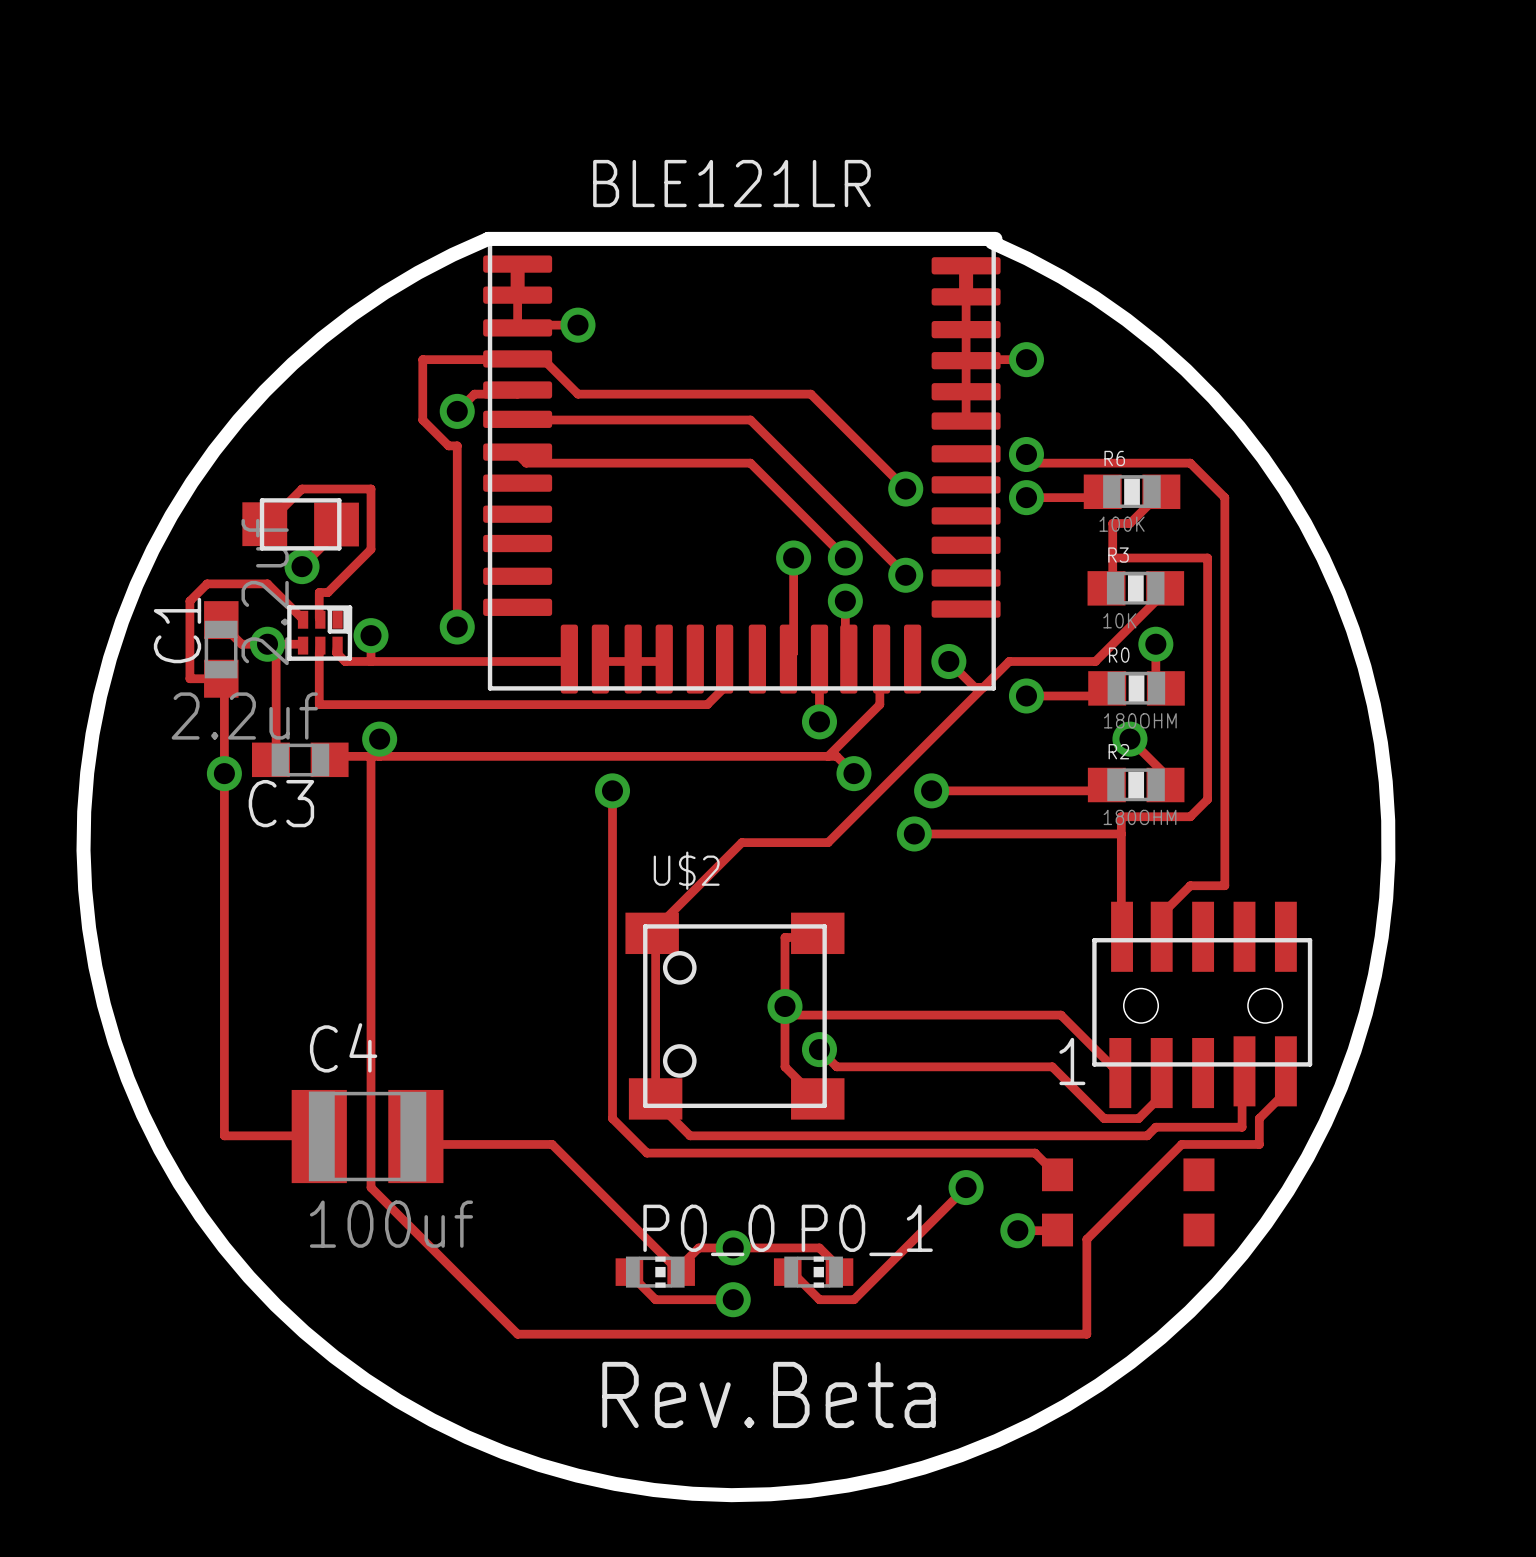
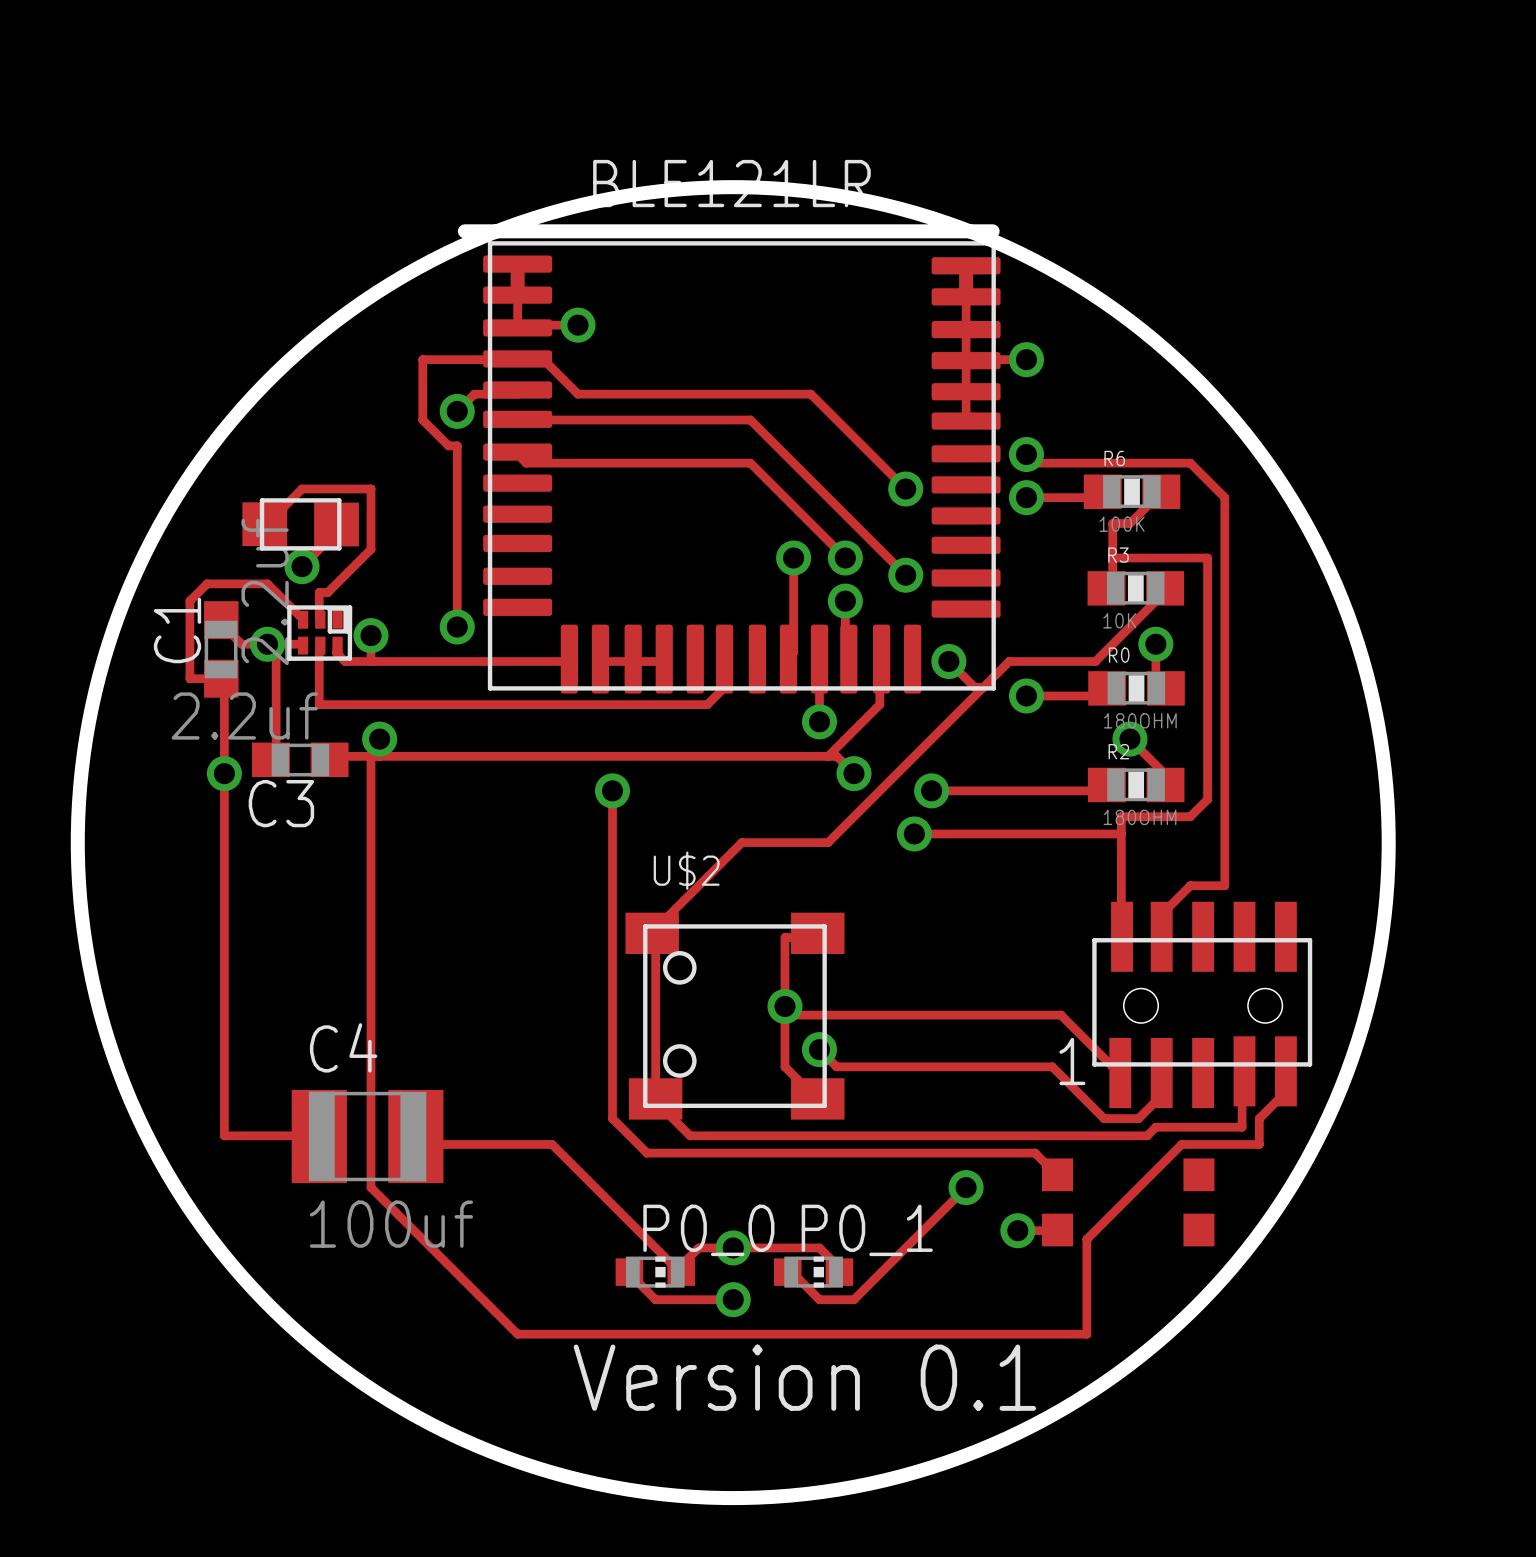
round board edge: none -> [70, 180, 1396, 1506]
board edge: none -> (464, 231) (992, 231)
board edge: (995, 238) (488, 238) (418, 272) (384, 292) (321, 338) (292, 364) (264, 391) (214, 450) (171, 515) (136, 585) (110, 658) (100, 696) (92, 734) (84, 811) (85, 889) (95, 966) (103, 1004) (127, 1078) (160, 1149) (179, 1183) (224, 1247) (249, 1277) (304, 1331) (365, 1379) (398, 1400) (467, 1437) (539, 1465) (577, 1475) (653, 1489) (731, 1495) (809, 1491) (885, 1477) (923, 1467) (996, 1440) (1031, 1424) (1099, 1384) (1161, 1337) (1216, 1283) (1242, 1254) (1287, 1190) (1307, 1157) (1341, 1087) (1354, 1050) (1374, 975) (1386, 898) (1388, 820) (1380, 743) (1373, 704) (1364, 666) (1339, 593) (1305, 523) (1285, 489) (1239, 427) (1213, 397) (1157, 344) (1094, 297) (1061, 277) (991, 242) -> none
text: Rev.Beta (769, 1394) -> Version 0.1 (804, 1377)

